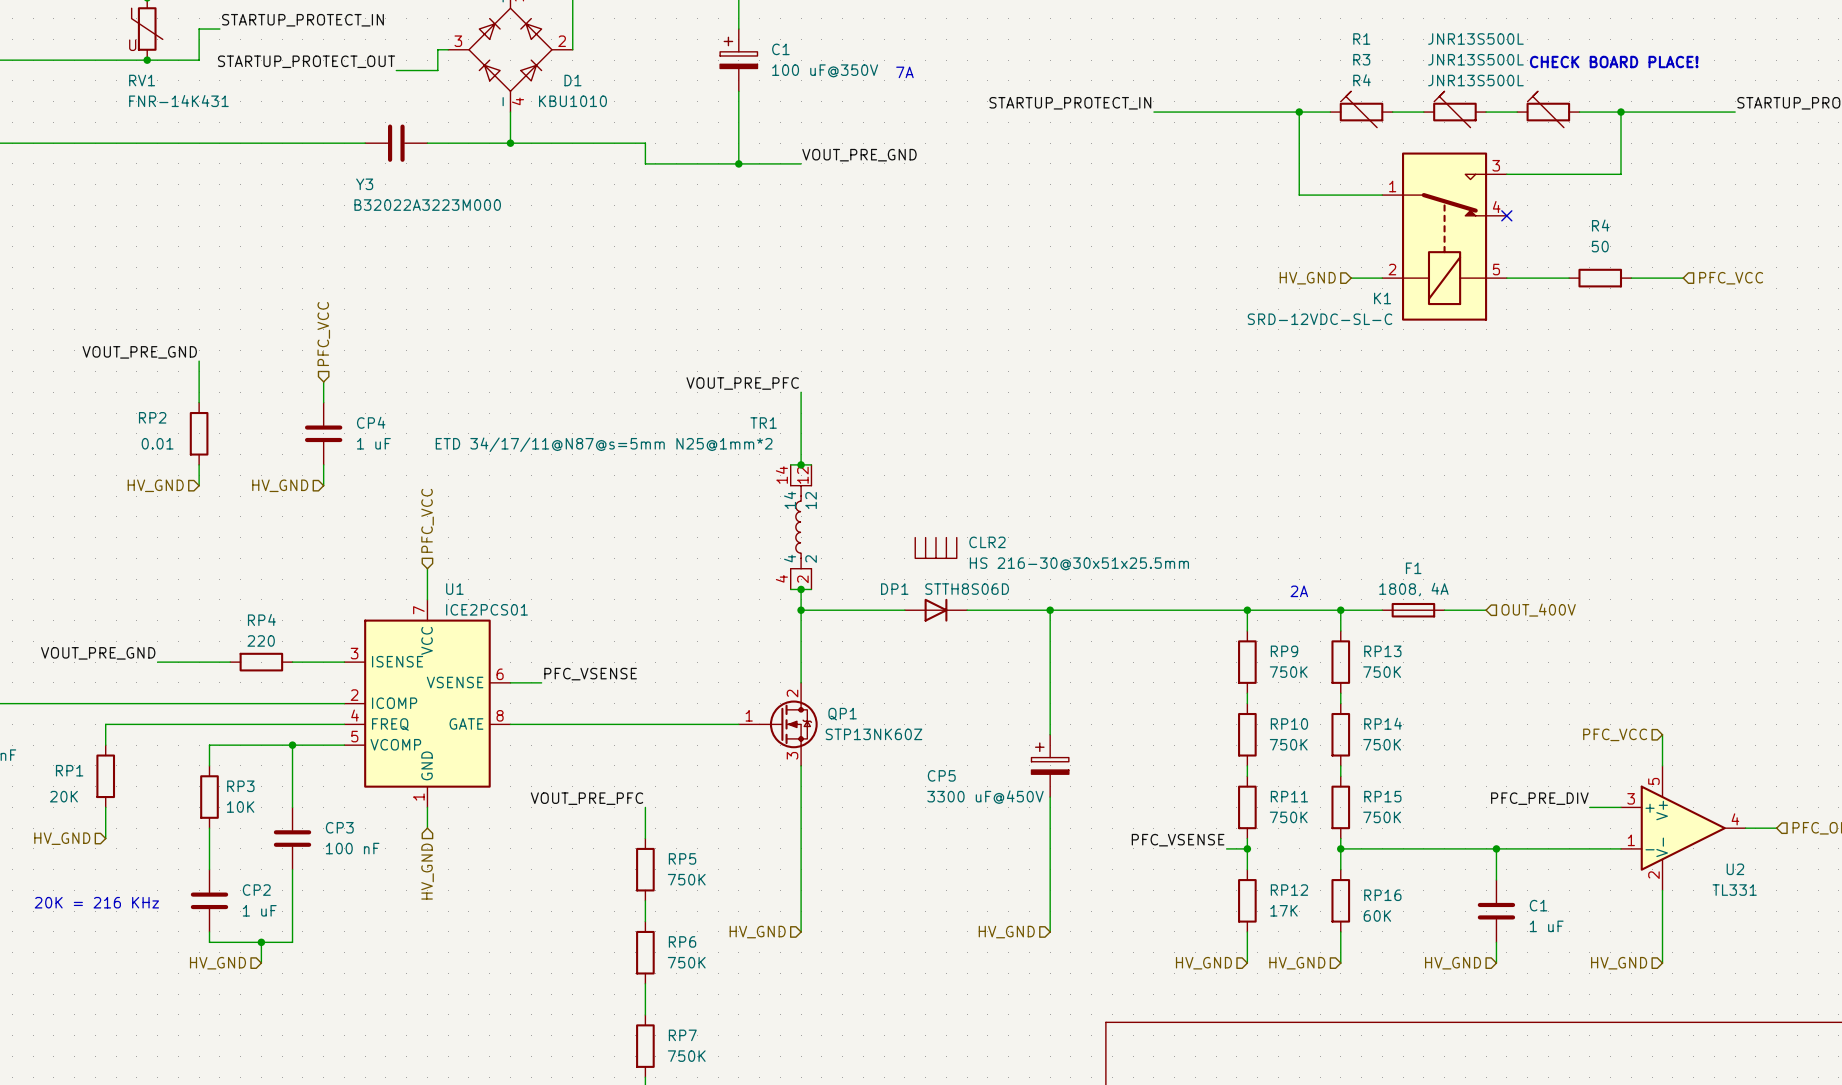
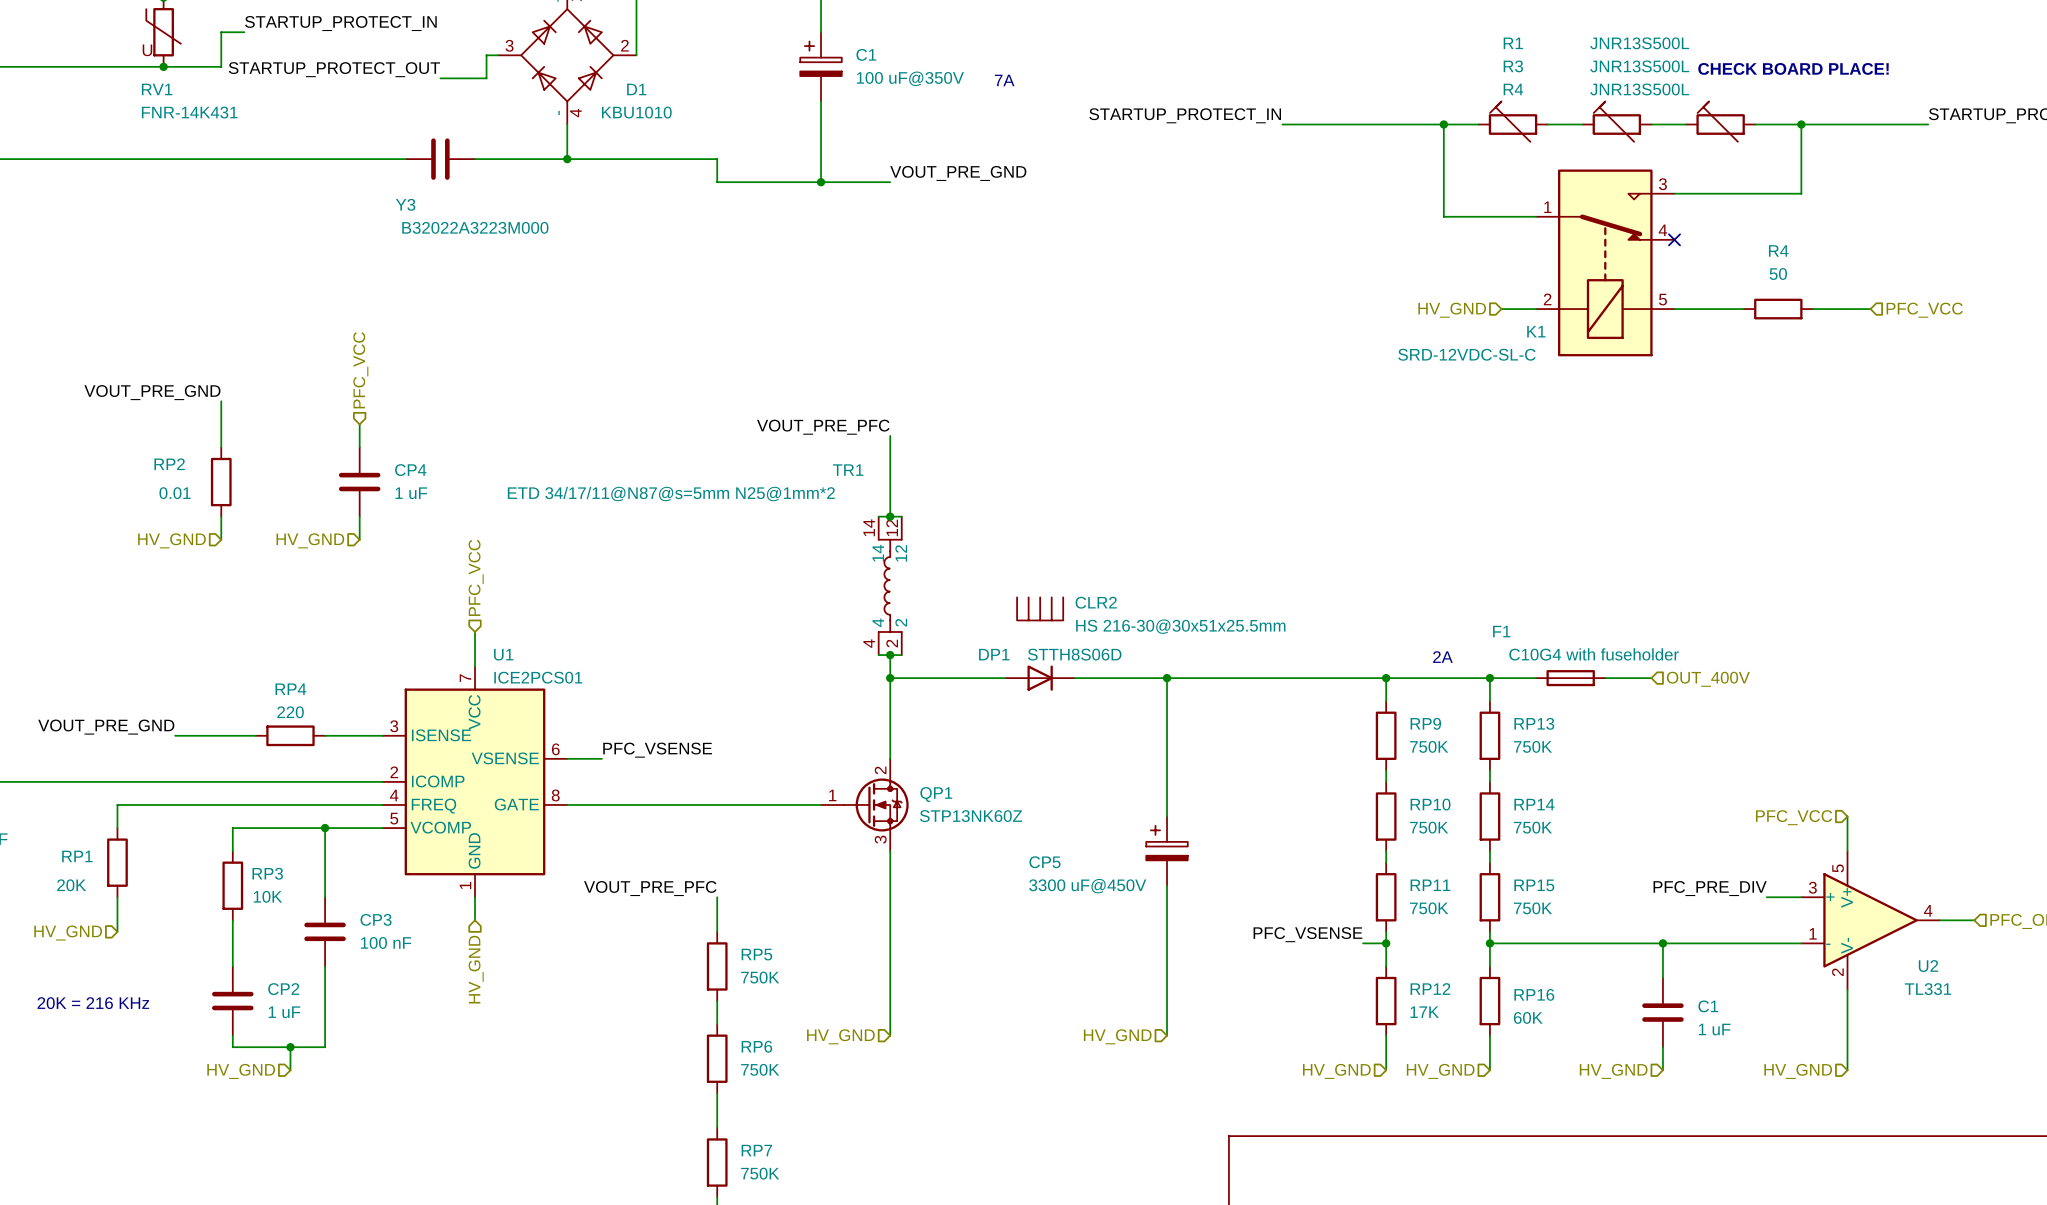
F1 name position: F1 (1413, 568) -> F1 (1501, 631)
F1 value: 1808, 4A (1413, 589) -> C10G4 with fuseholder (1594, 654)

